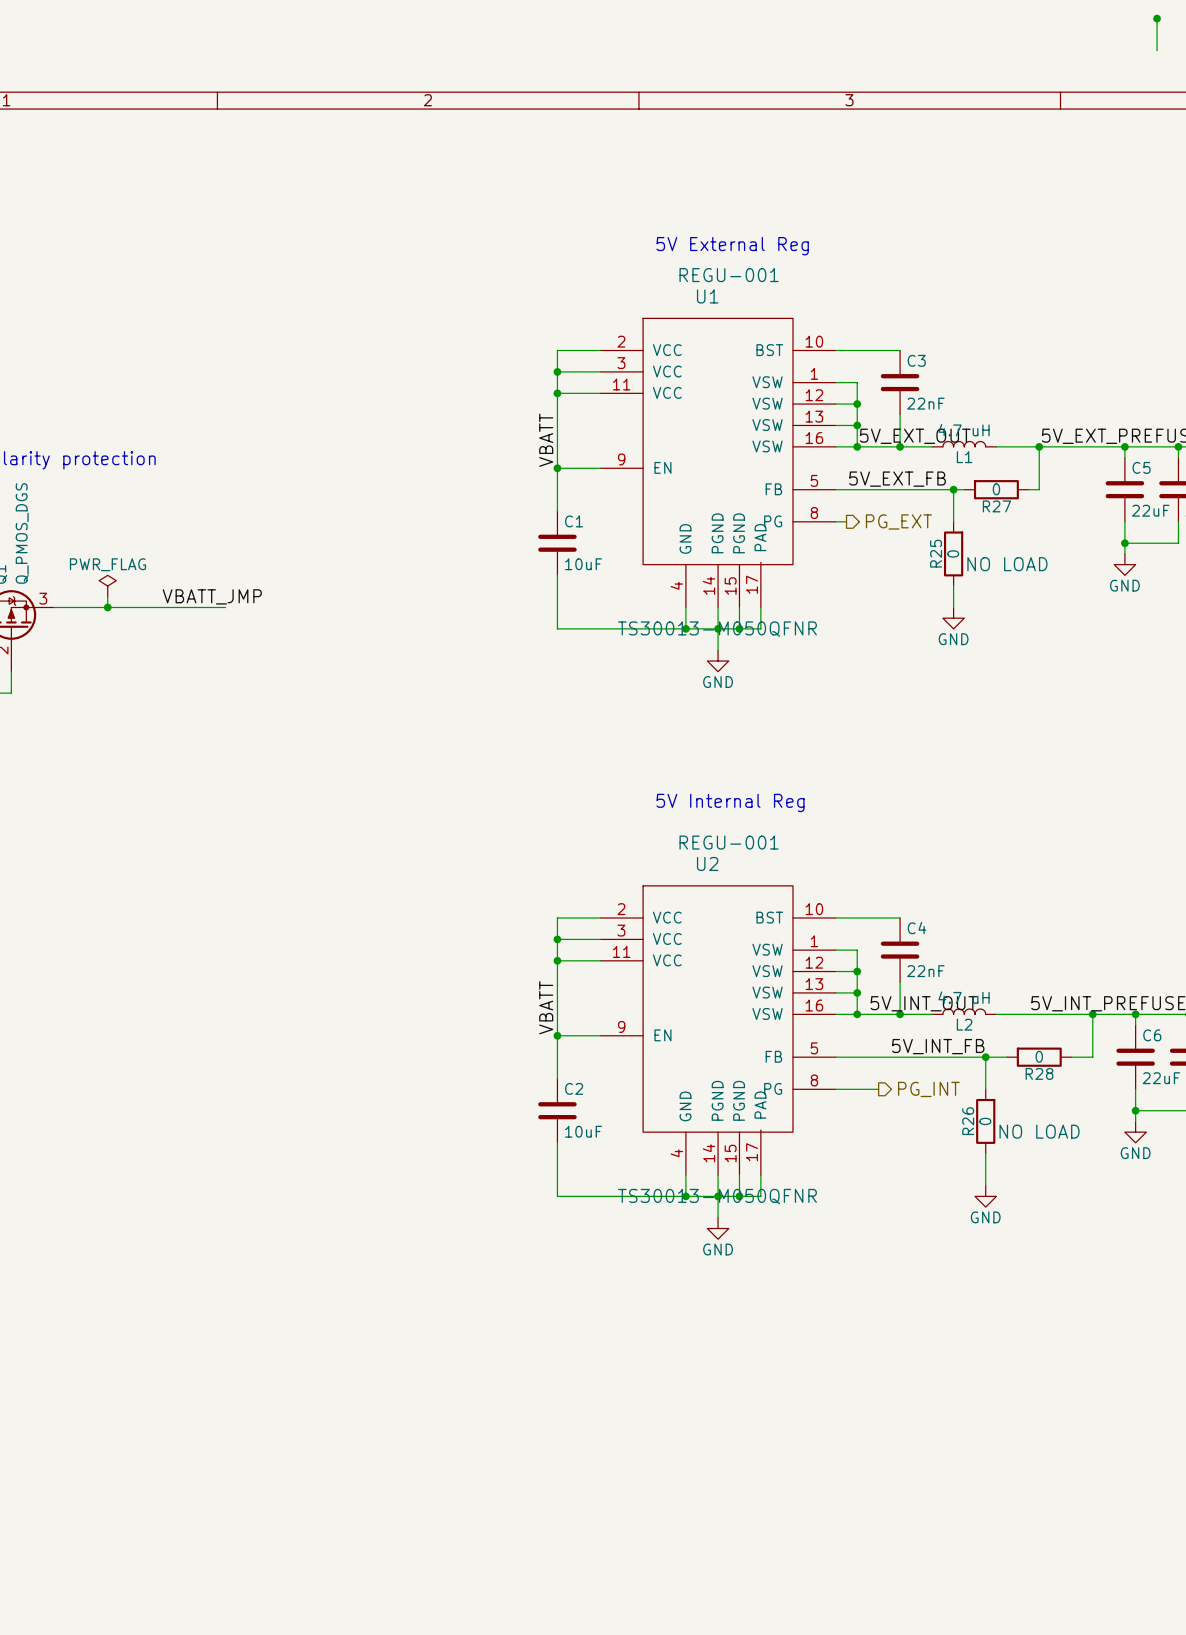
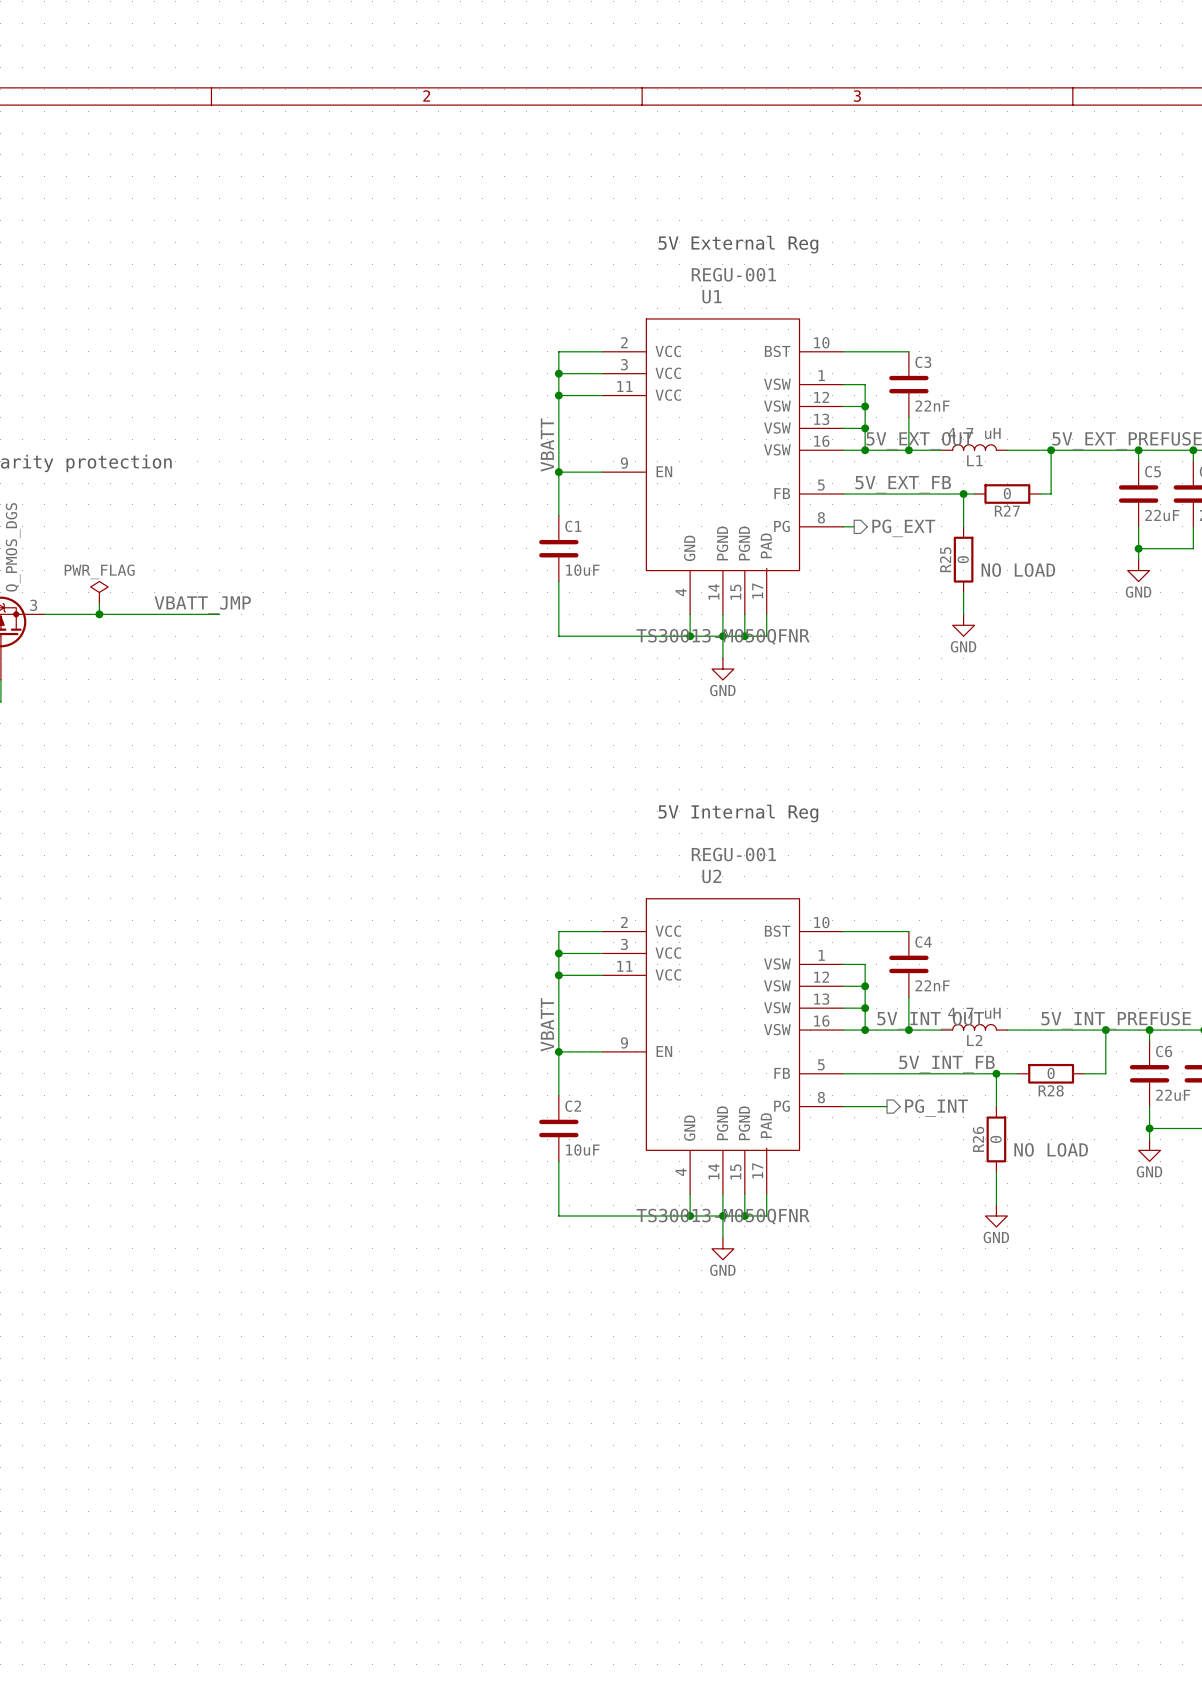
wire: (1157, 18) (1157, 50) -> none
junction: (1157, 18) -> none

